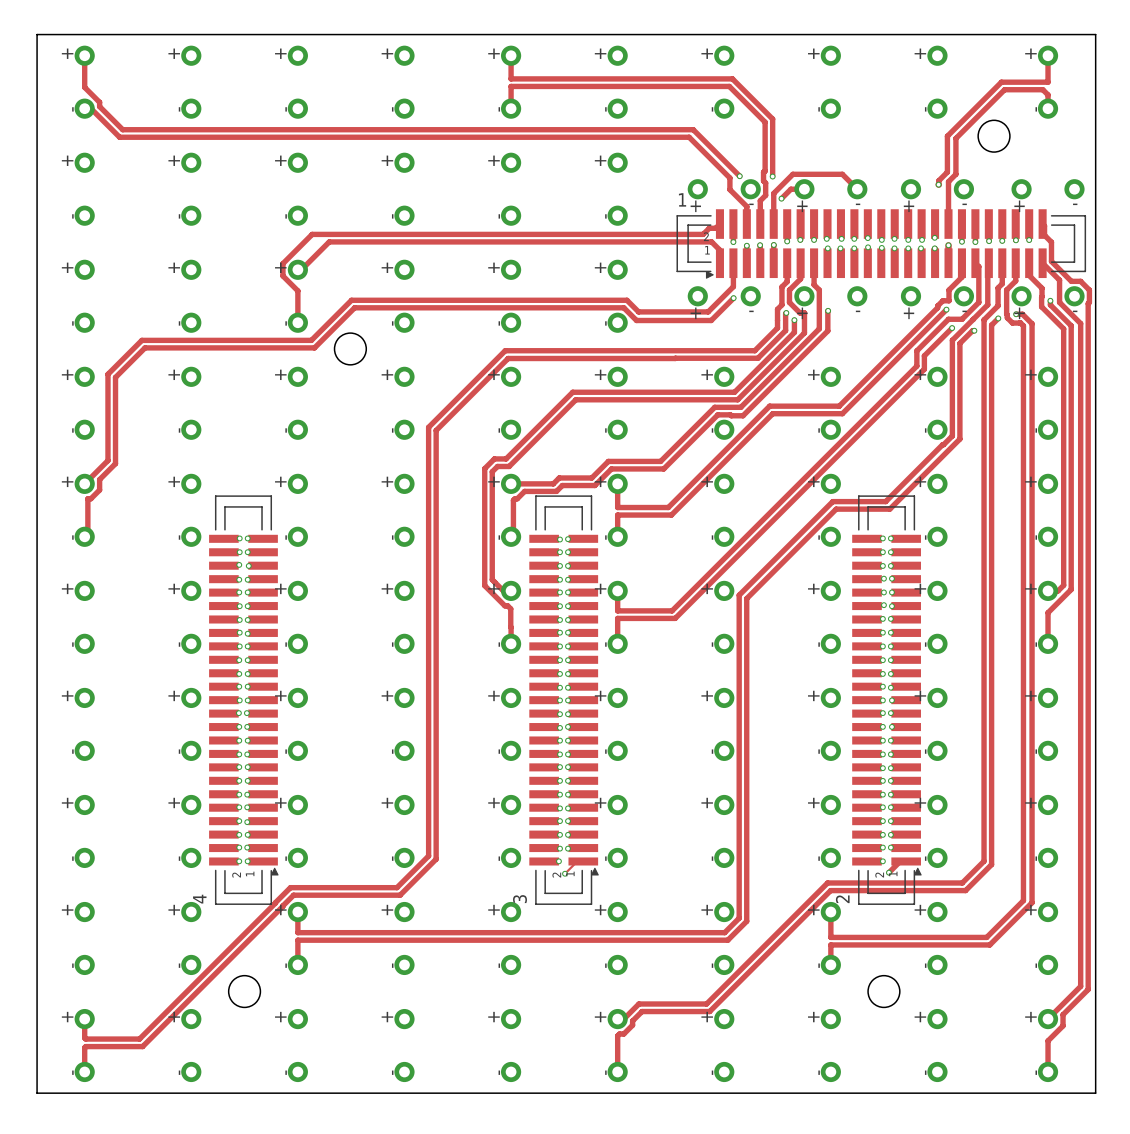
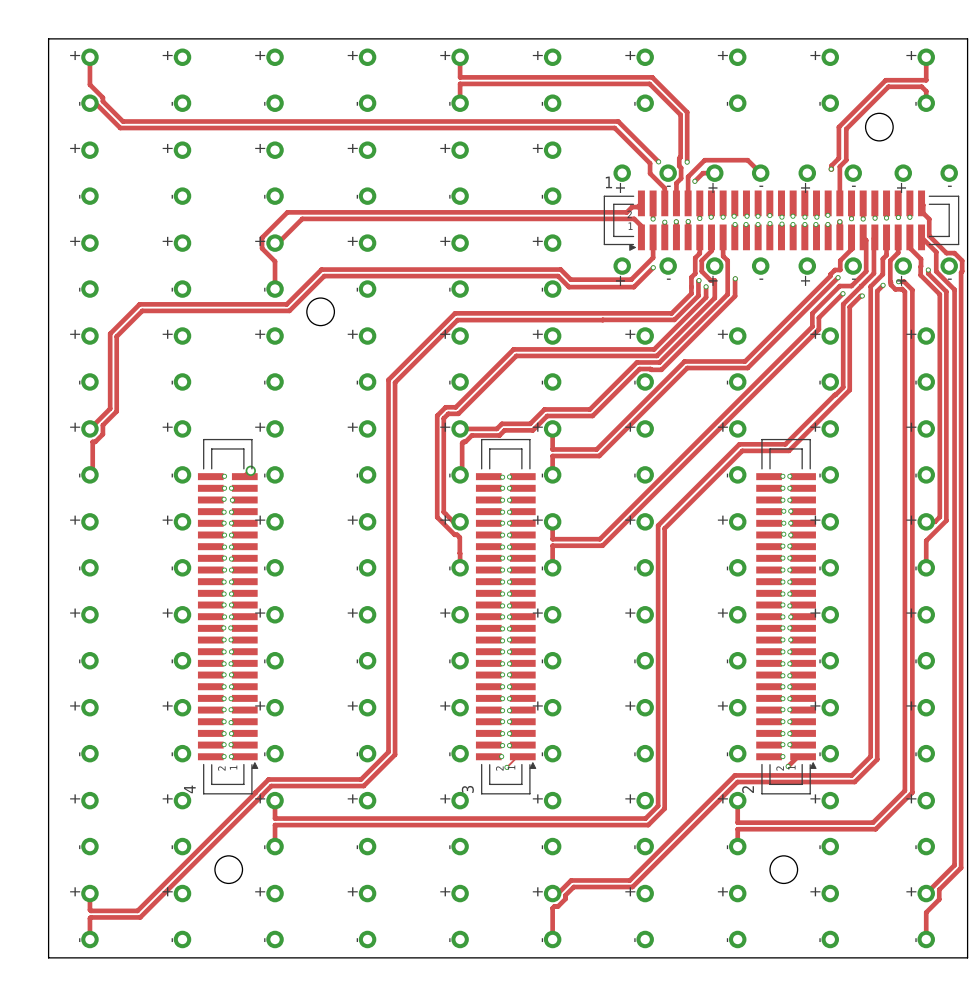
via: none -> (250, 470)
via: (247, 538) -> none

